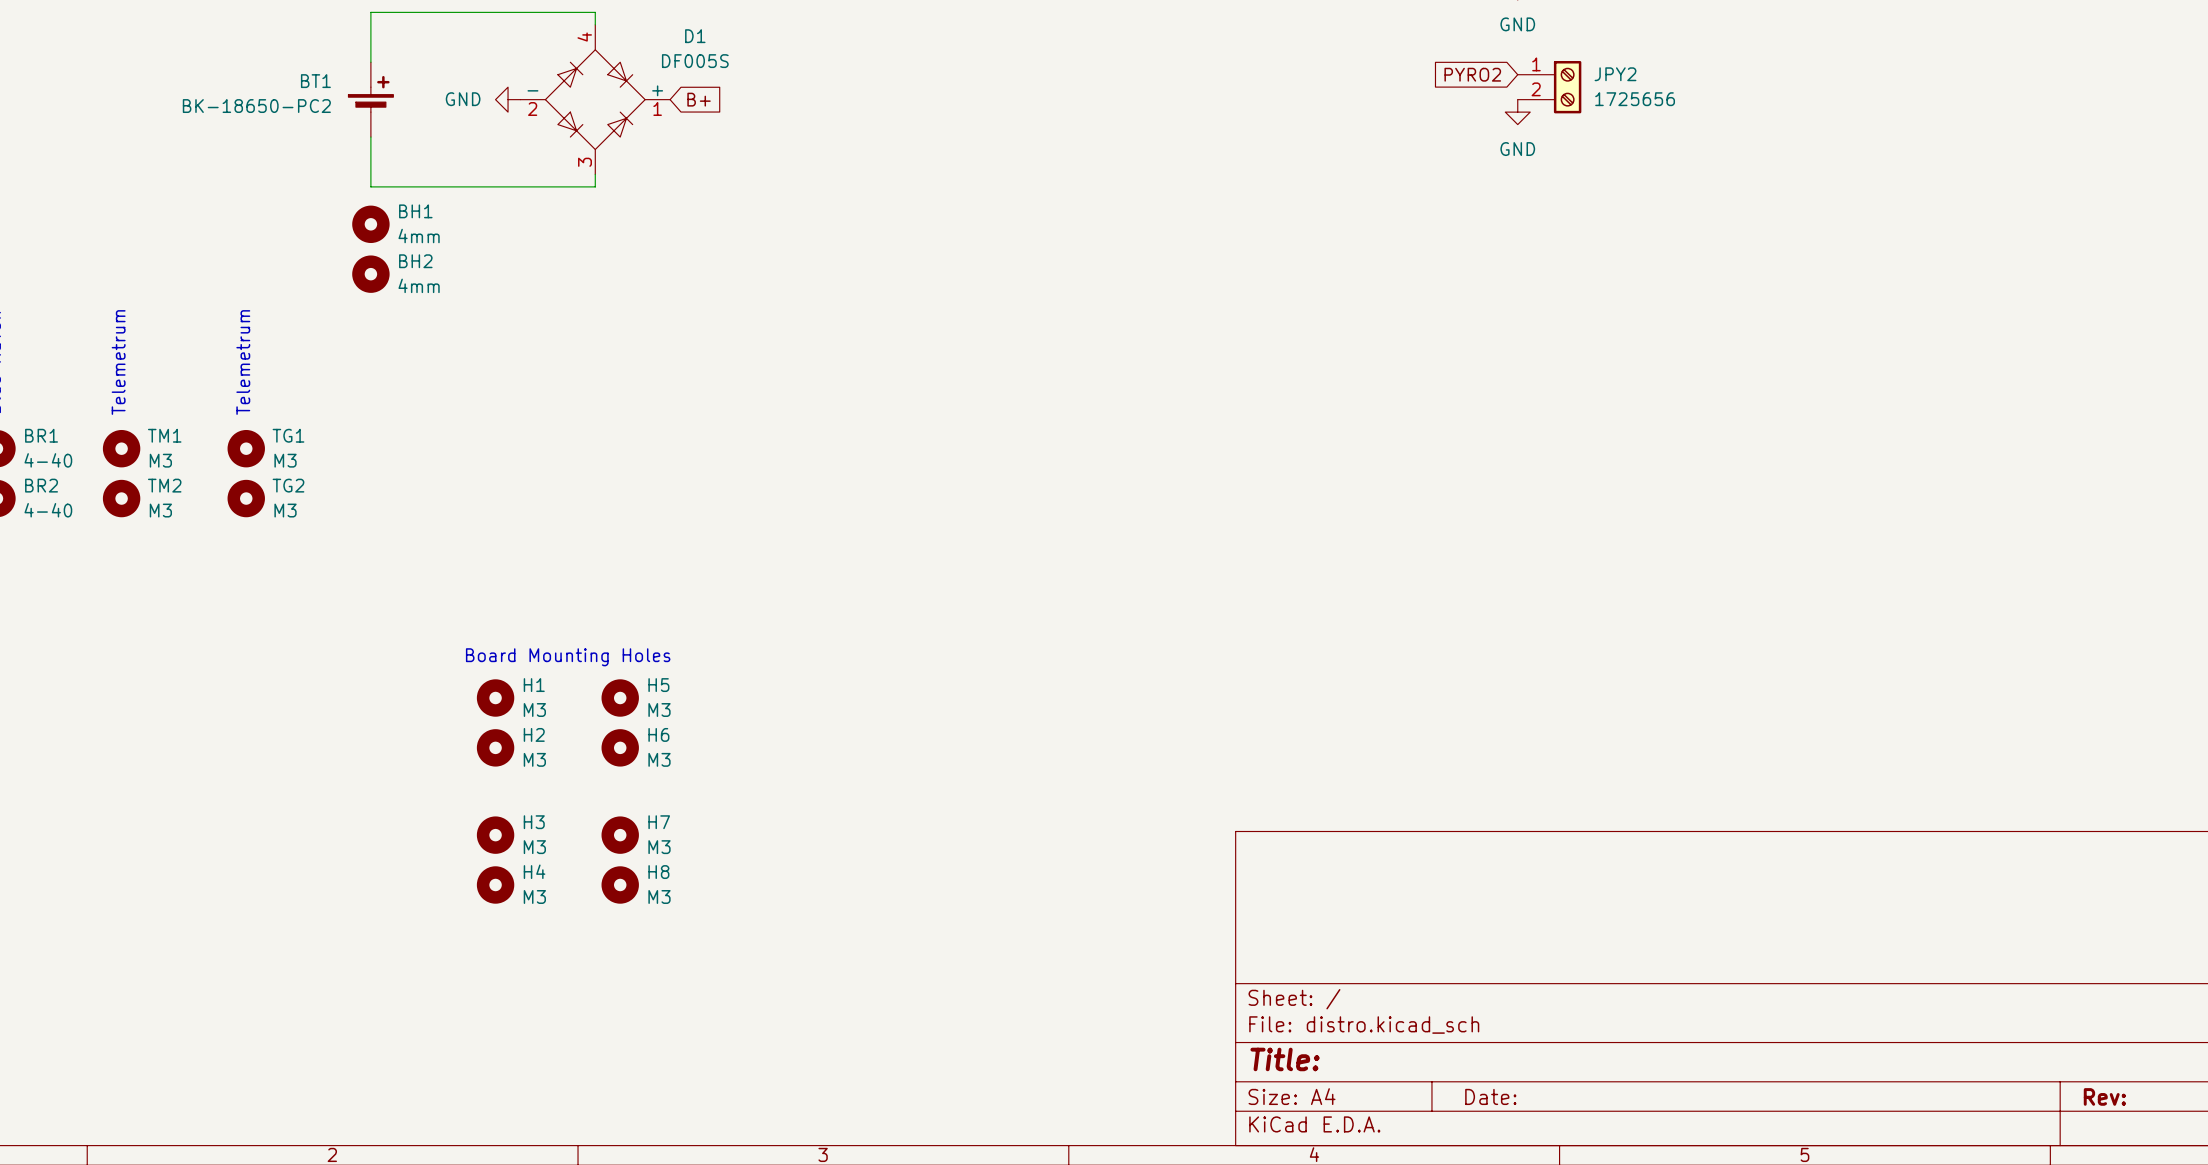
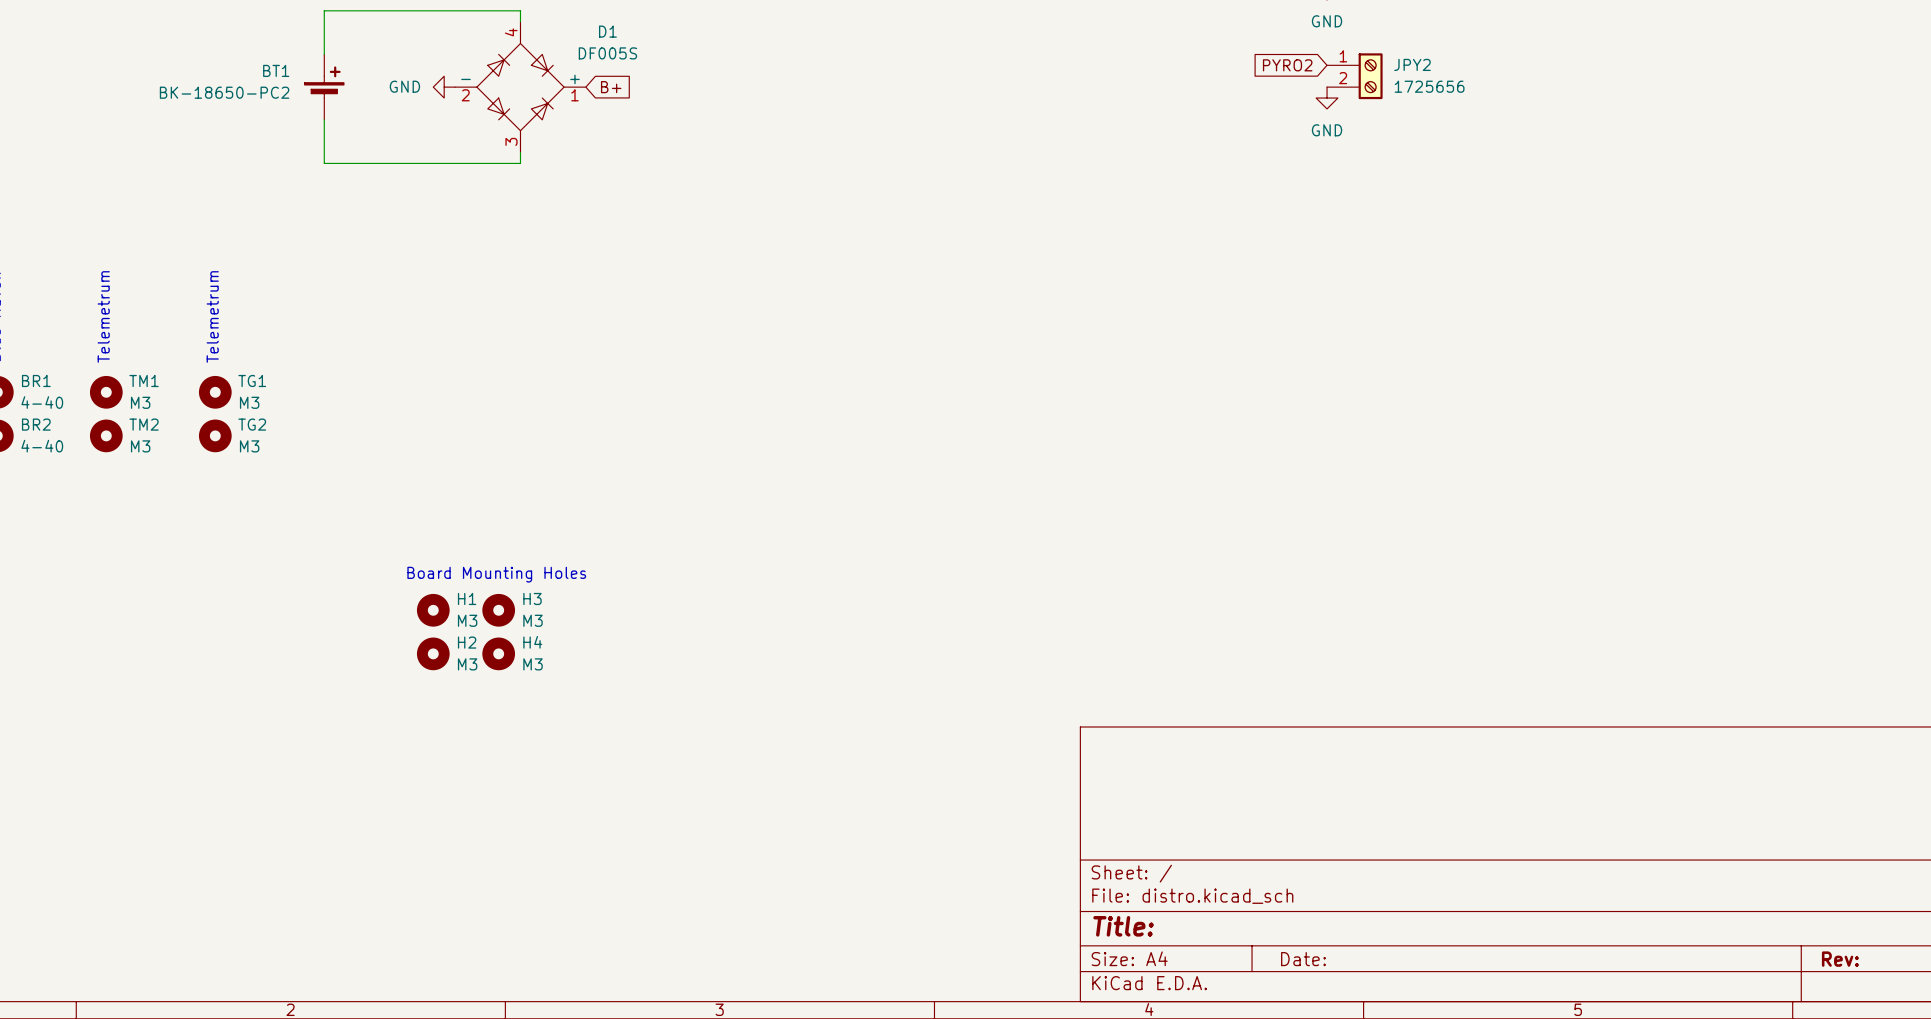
BH1: 4mm (370, 224) -> none
BH2: 4mm (370, 274) -> none
H5: M3 (620, 698) -> none
H6: M3 (620, 747) -> none
H3 position: (495, 835) -> (498, 610)
H7: M3 (620, 835) -> none
H4 position: (495, 884) -> (498, 653)
H8: M3 (620, 884) -> none

